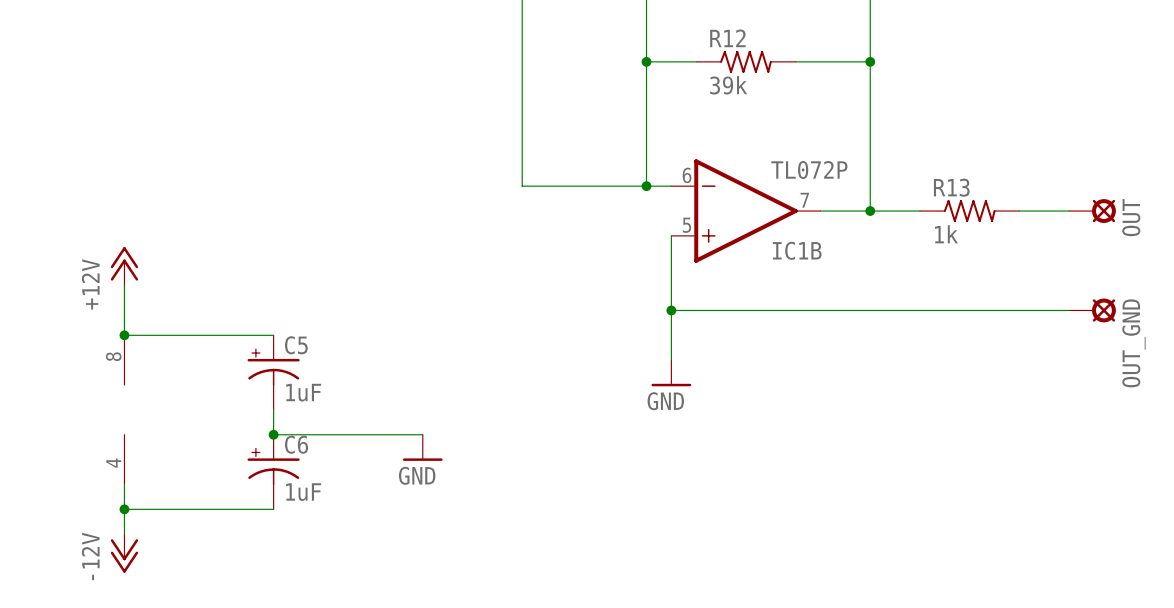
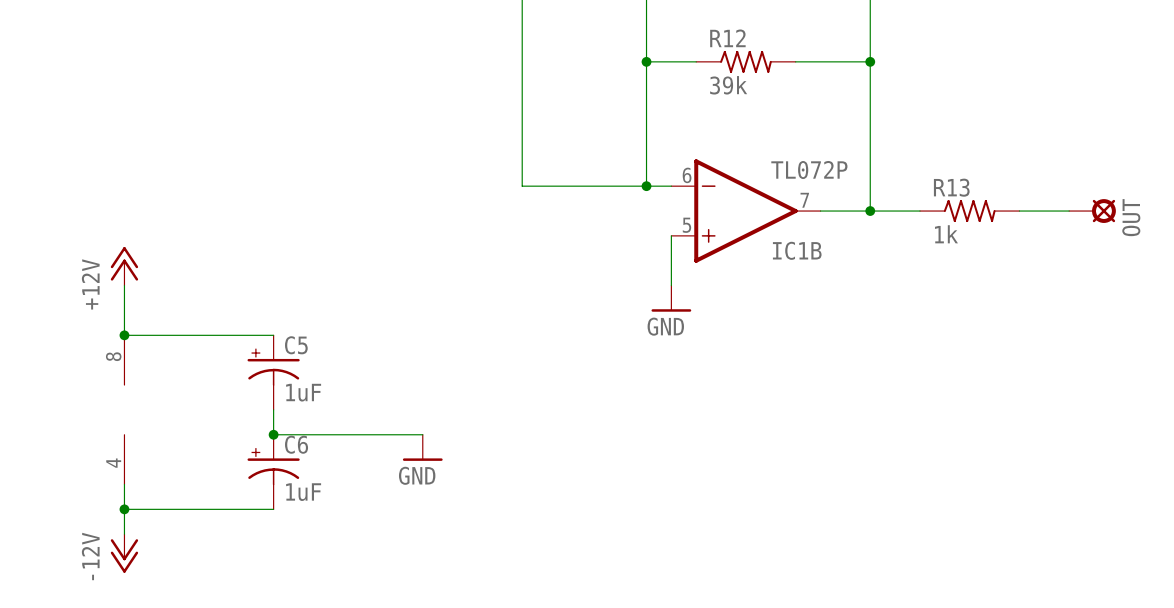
wire: (671, 285) (671, 360) -> none
wire: (671, 310) (1069, 310) -> none
junction: (671, 310) -> none
OUT_GND: (1092, 310) -> none
power symbol position: GND (671, 373) -> GND (671, 298)

